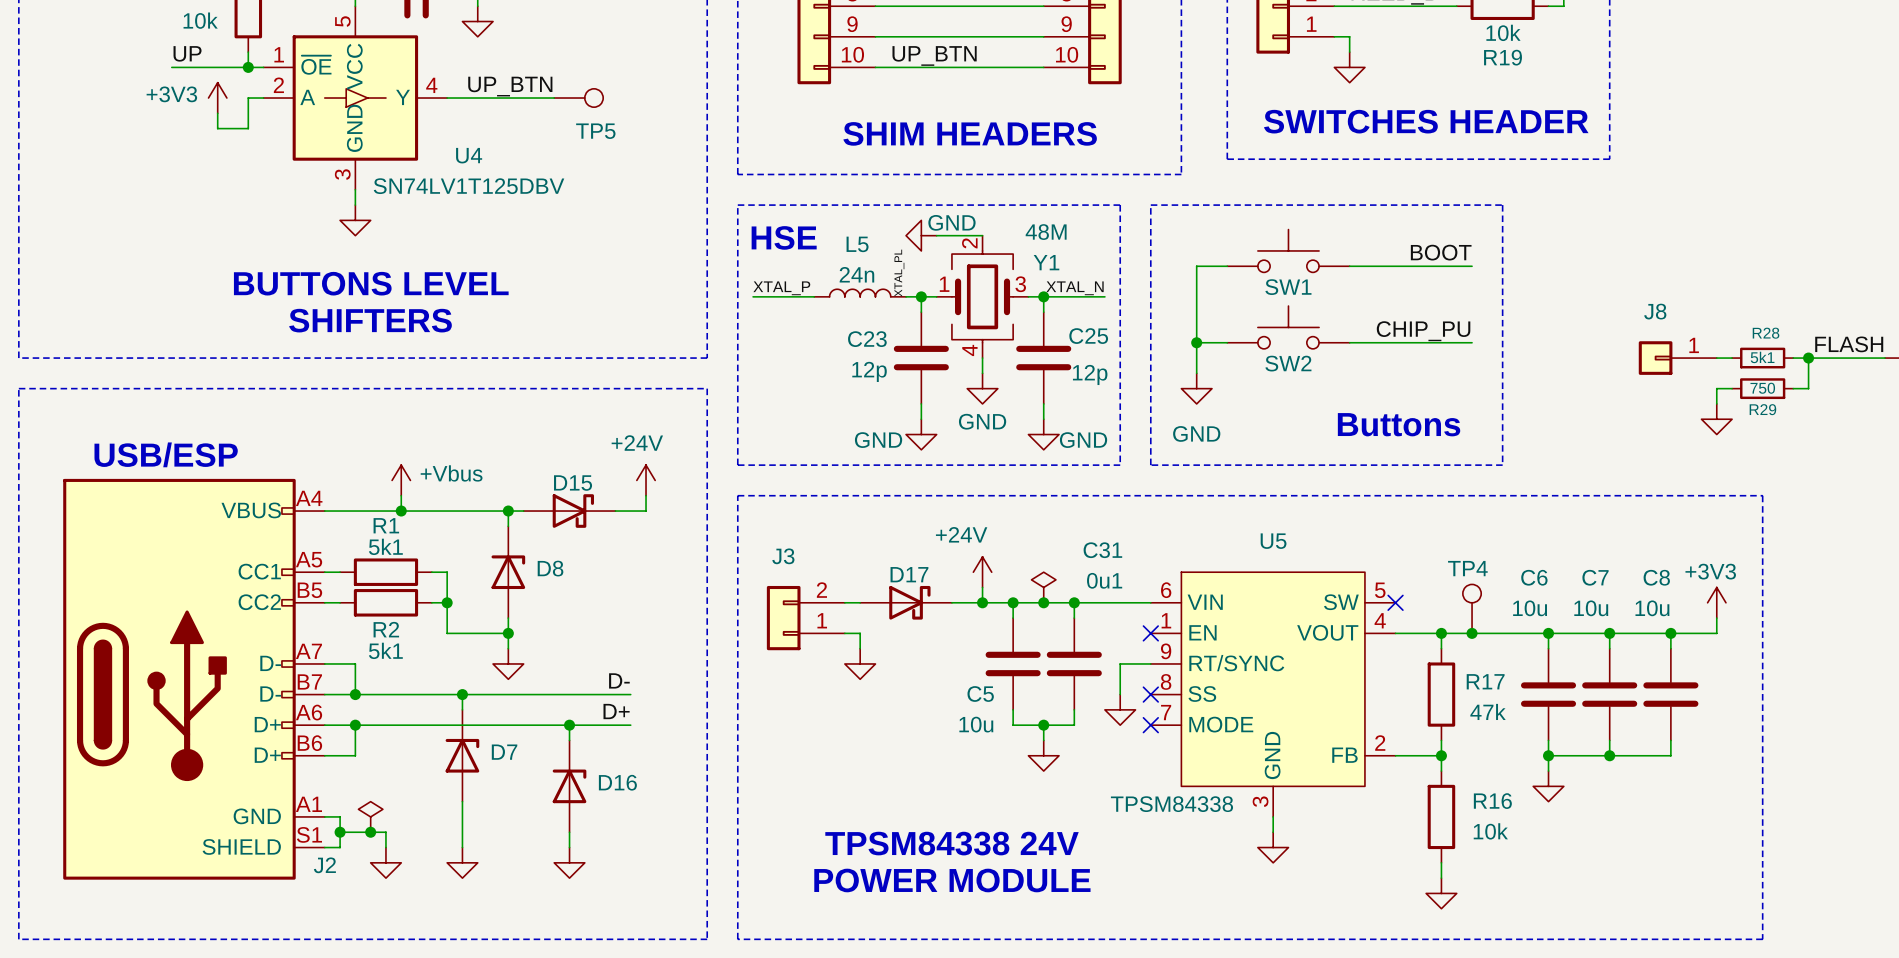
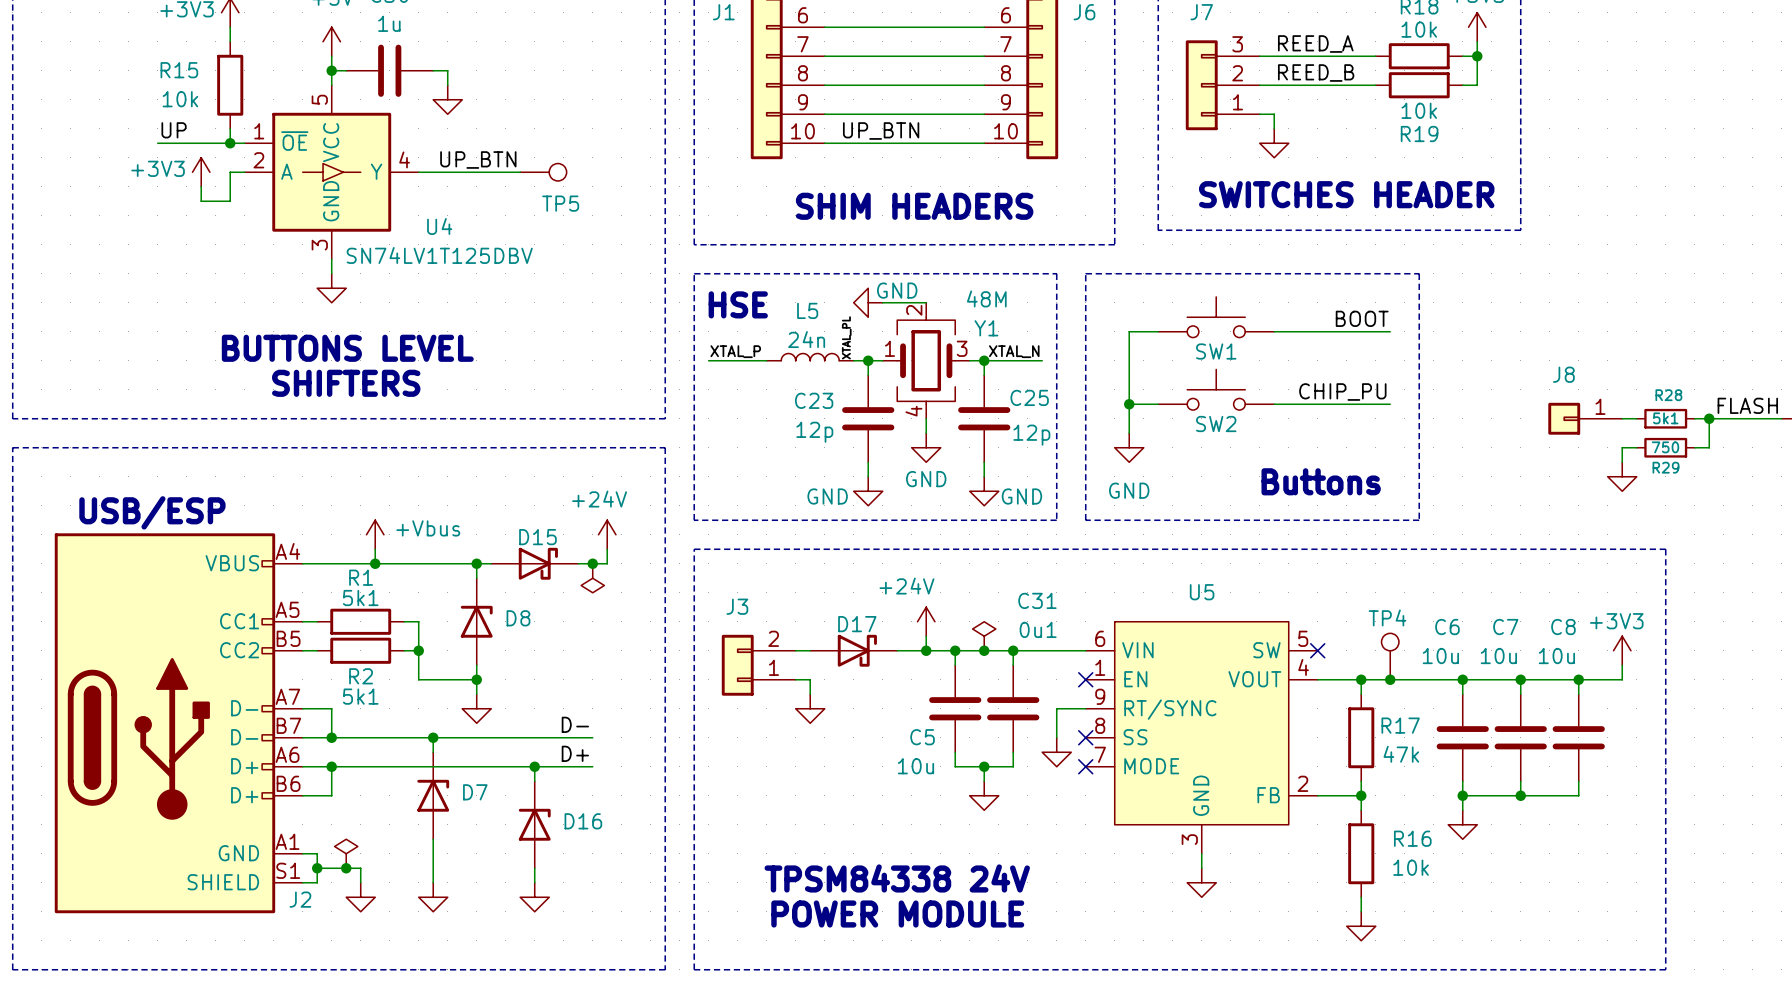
junction: none -> (592, 563)
power symbol: none -> (592, 578)
U5 value: TPSM84338 (1171, 804) -> none

